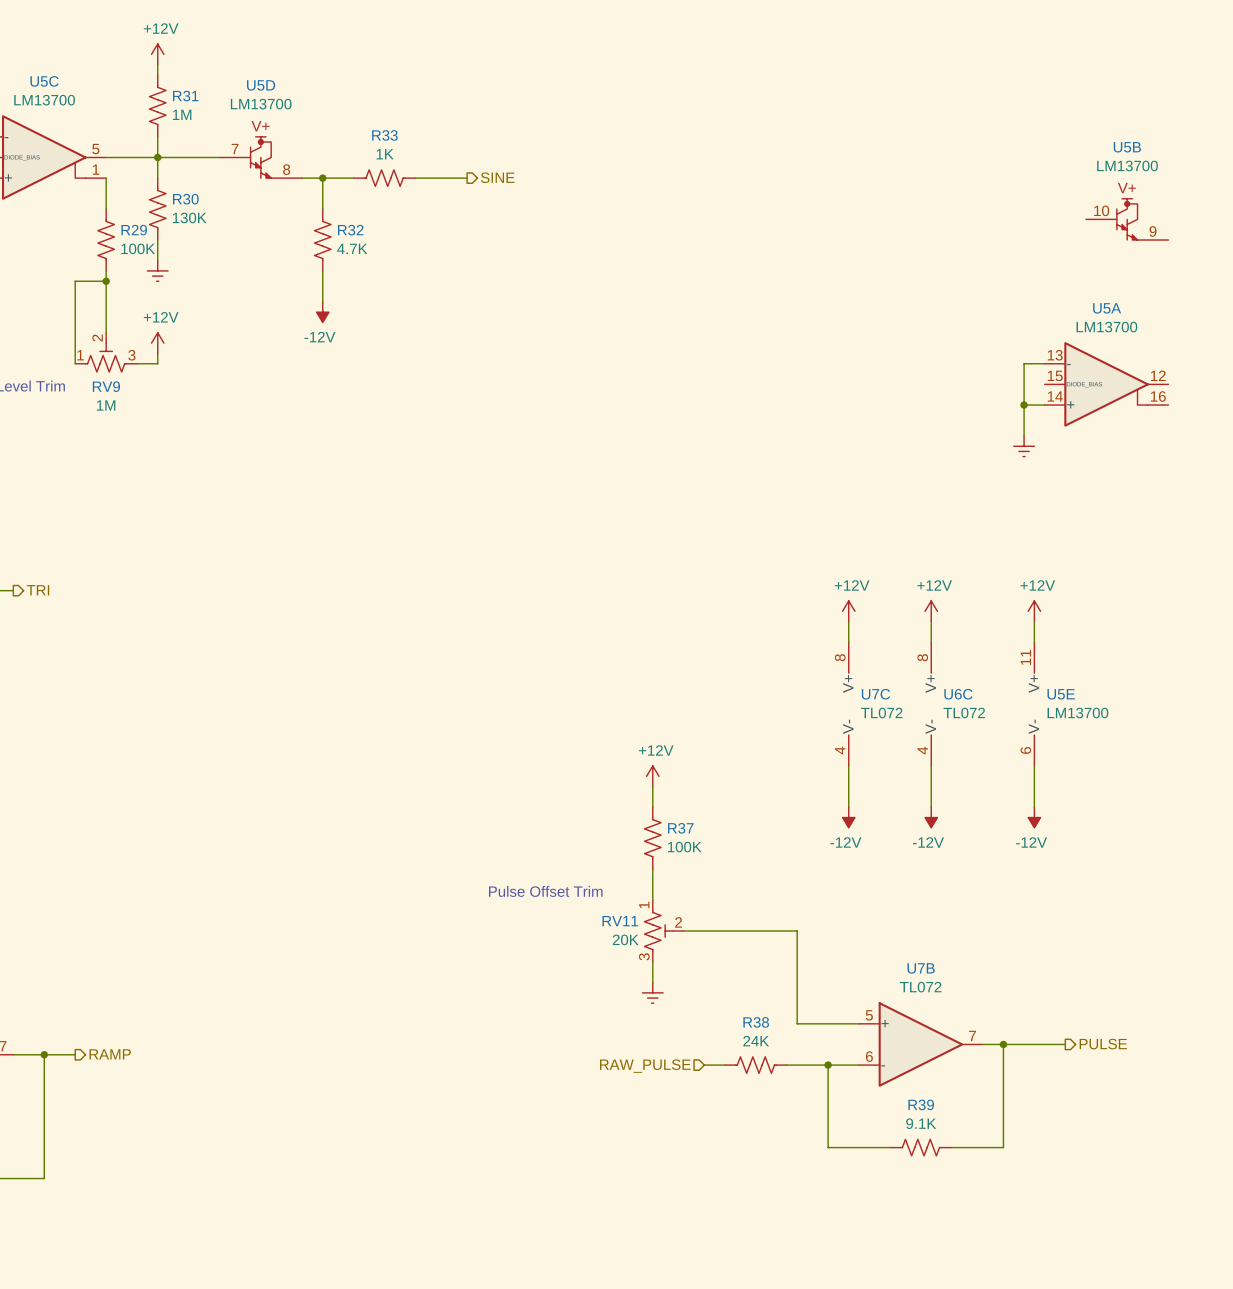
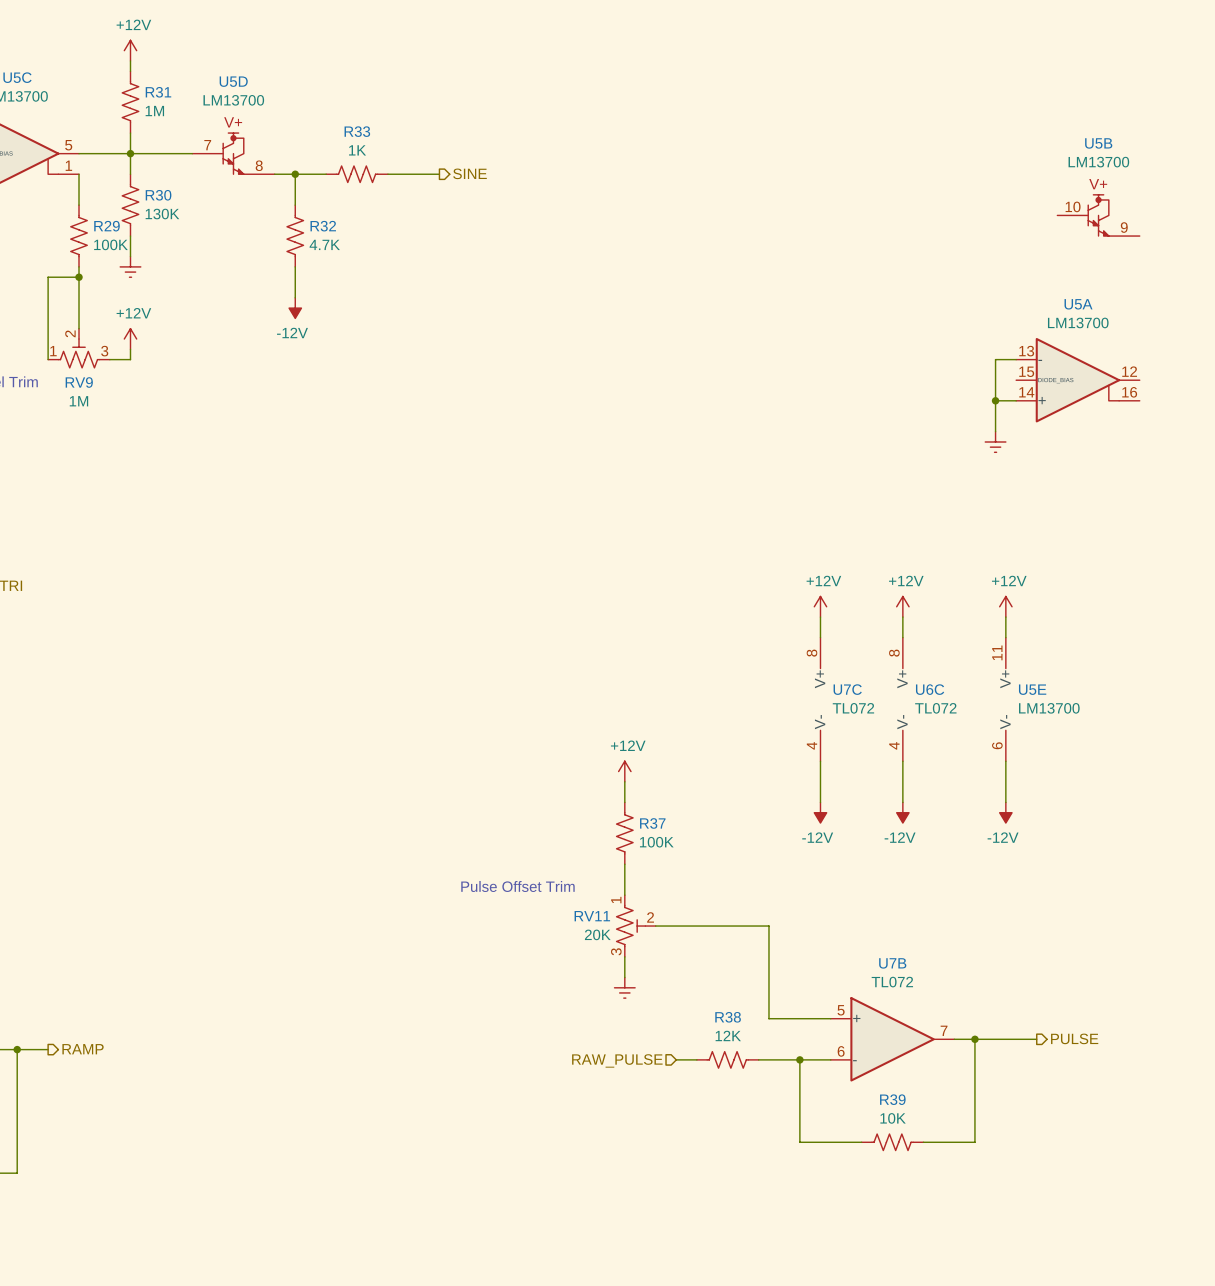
R38 value: 24K (756, 1041) -> 12K (728, 1035)
R39 value: 9.1K (921, 1123) -> 10K (893, 1118)

